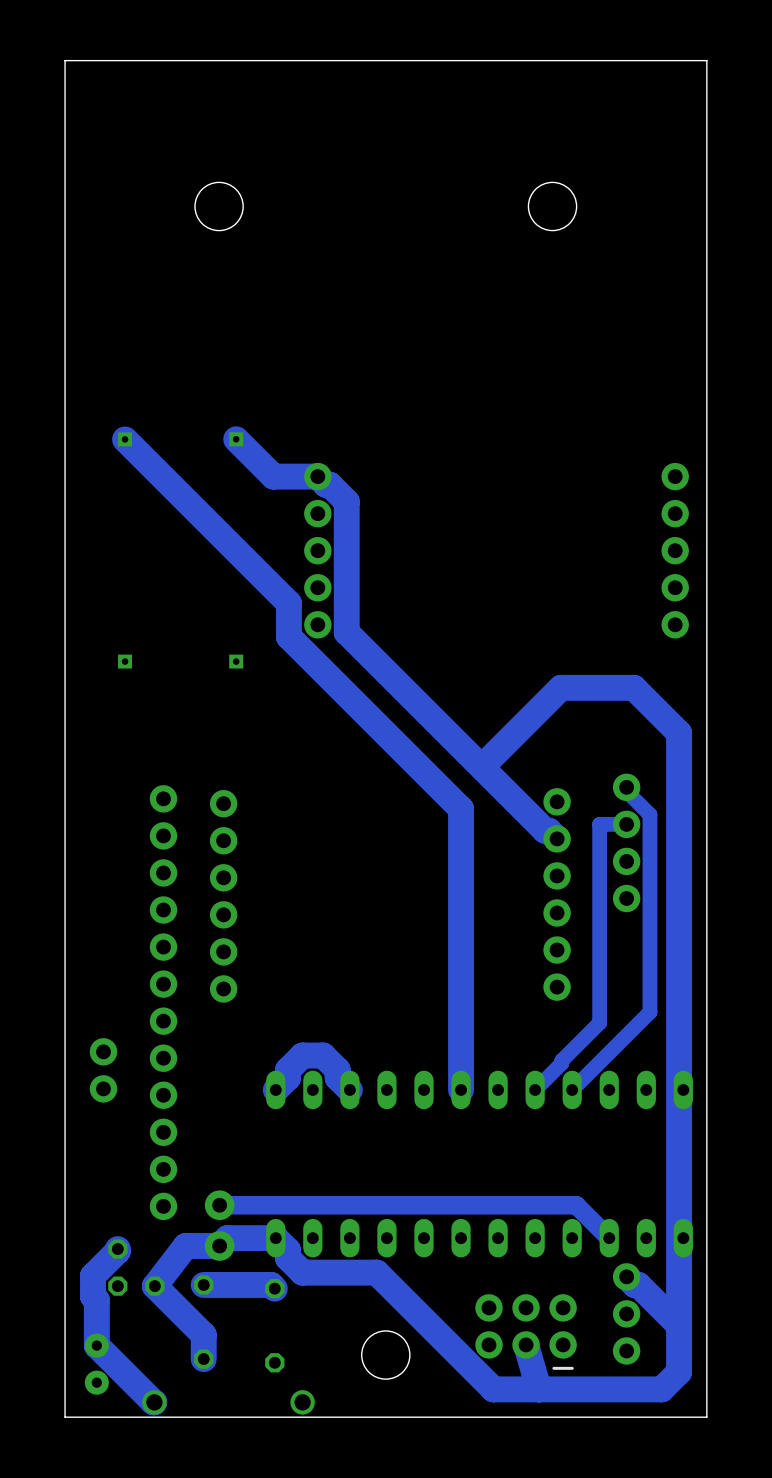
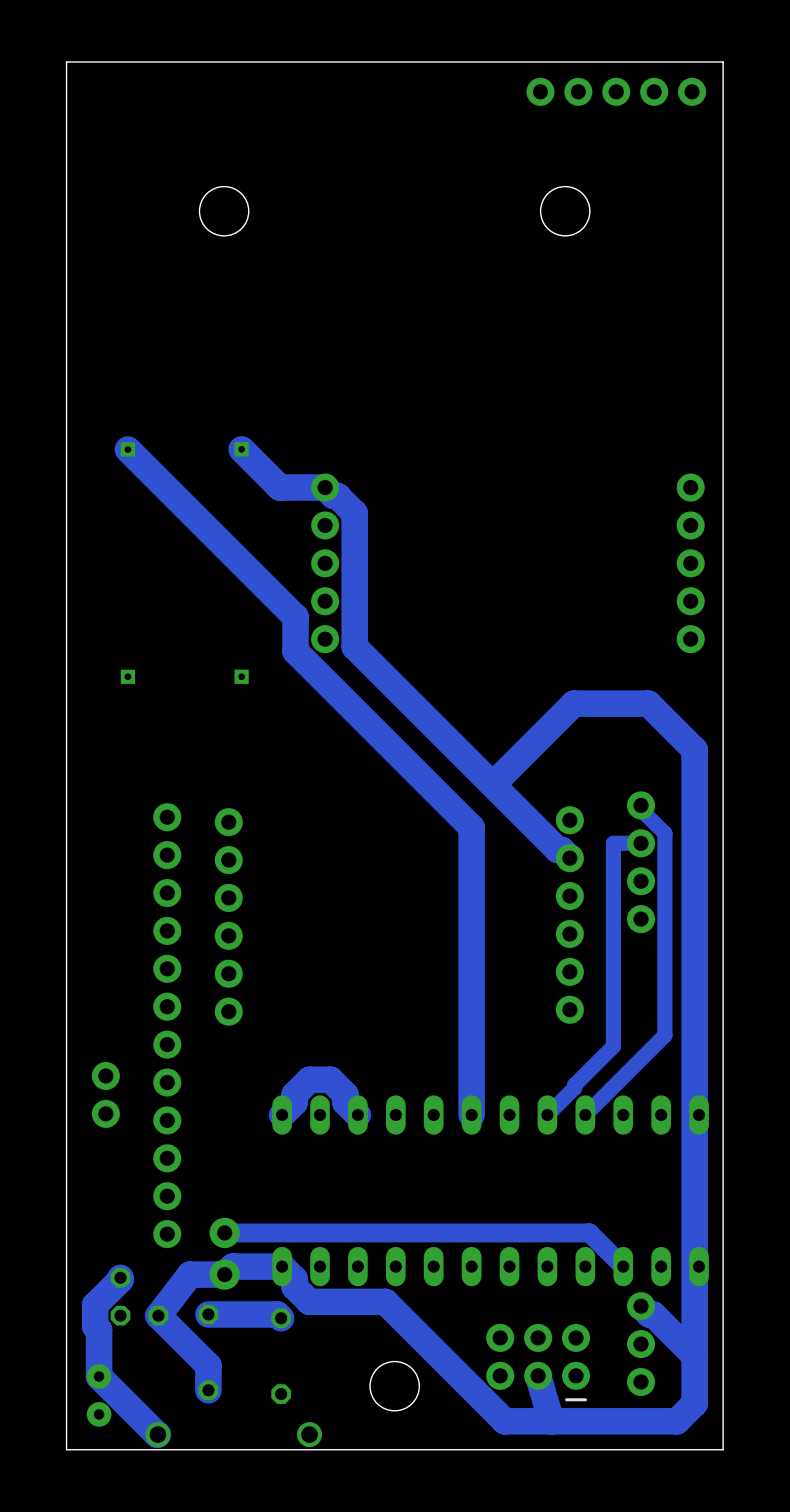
part: none -> (616, 91)

